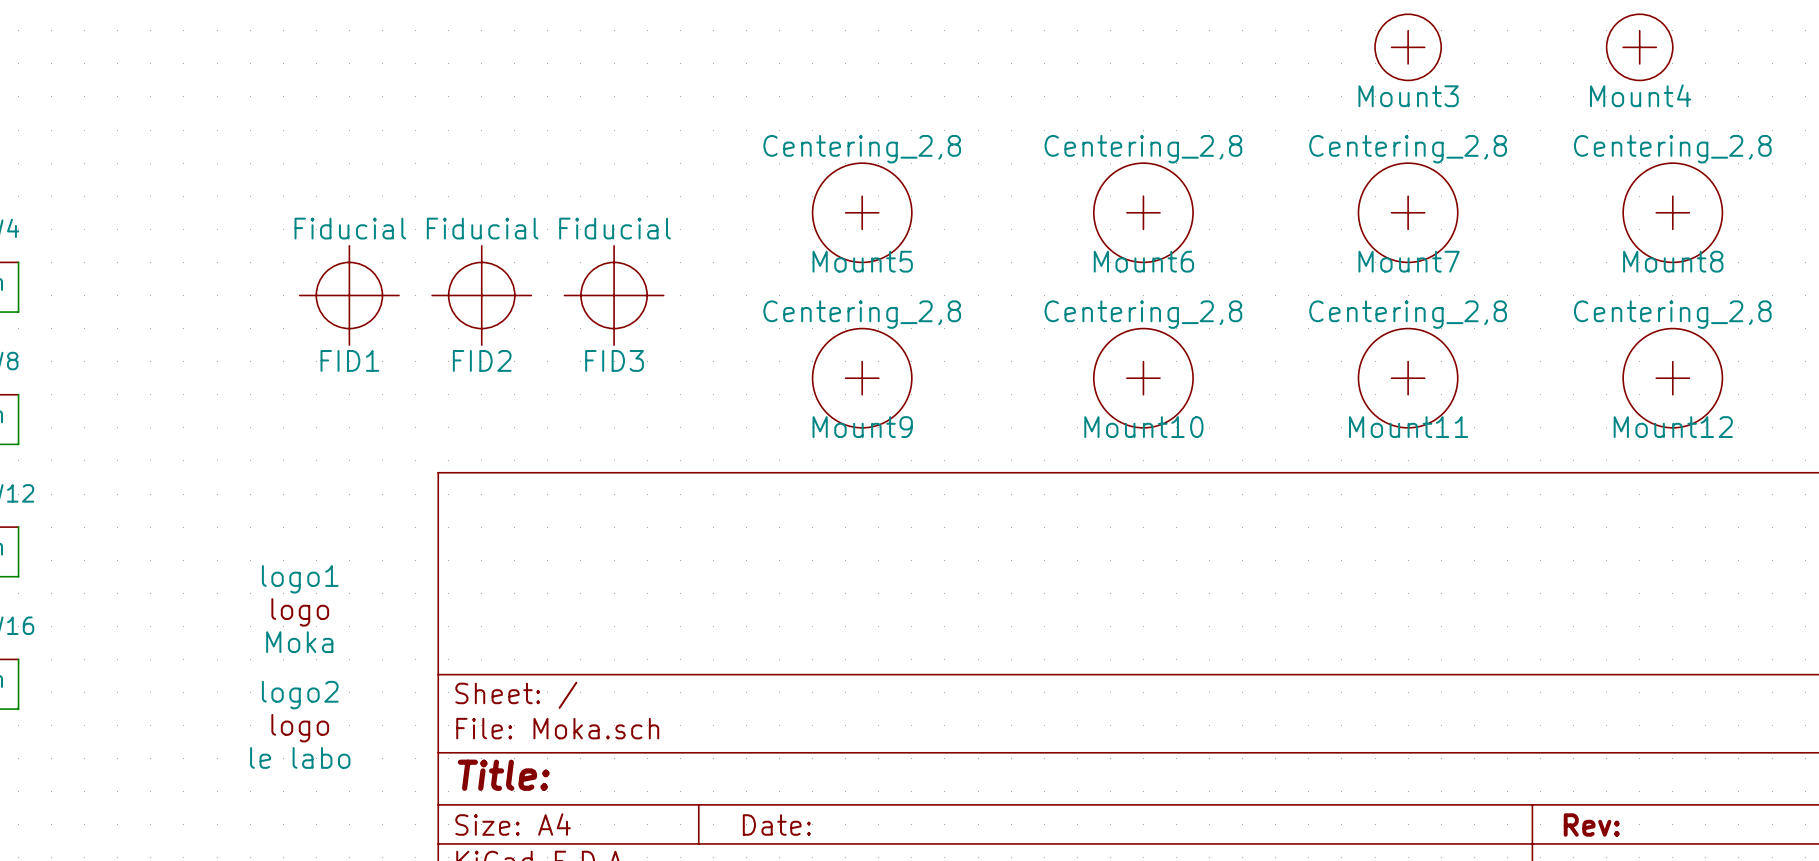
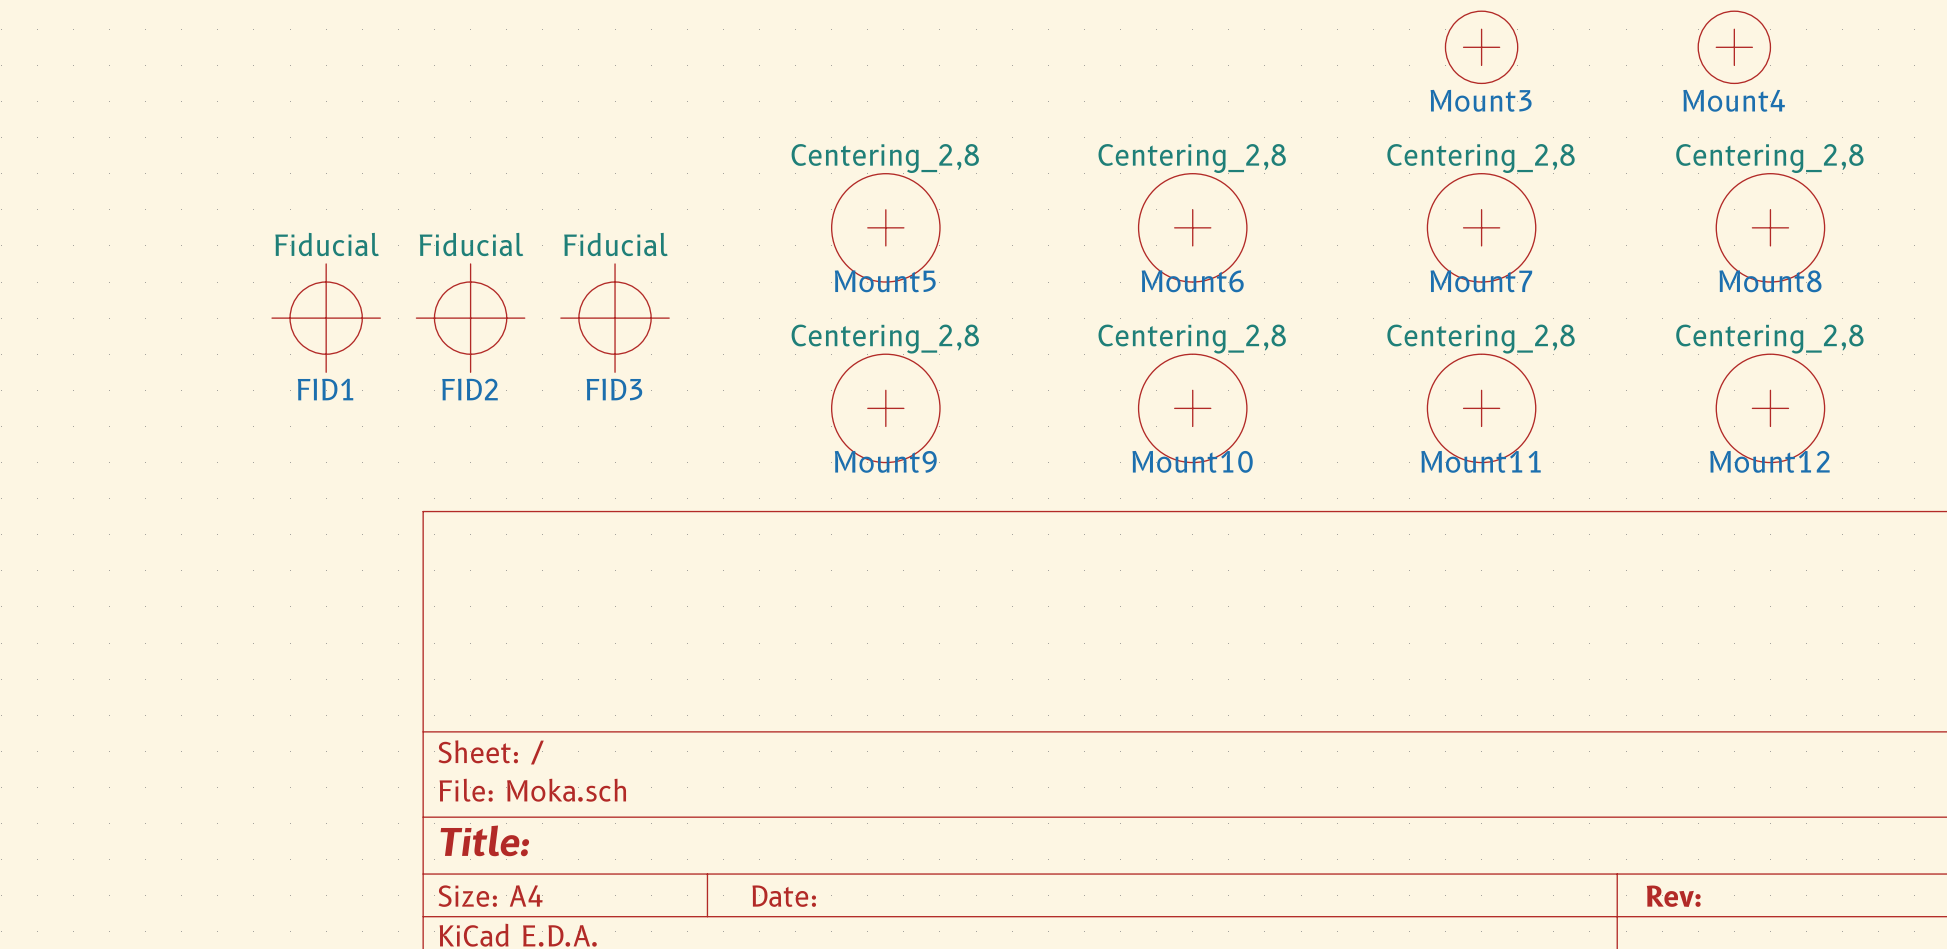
logo1: Moka (300, 609) -> none
logo2: le labo (300, 724) -> none

